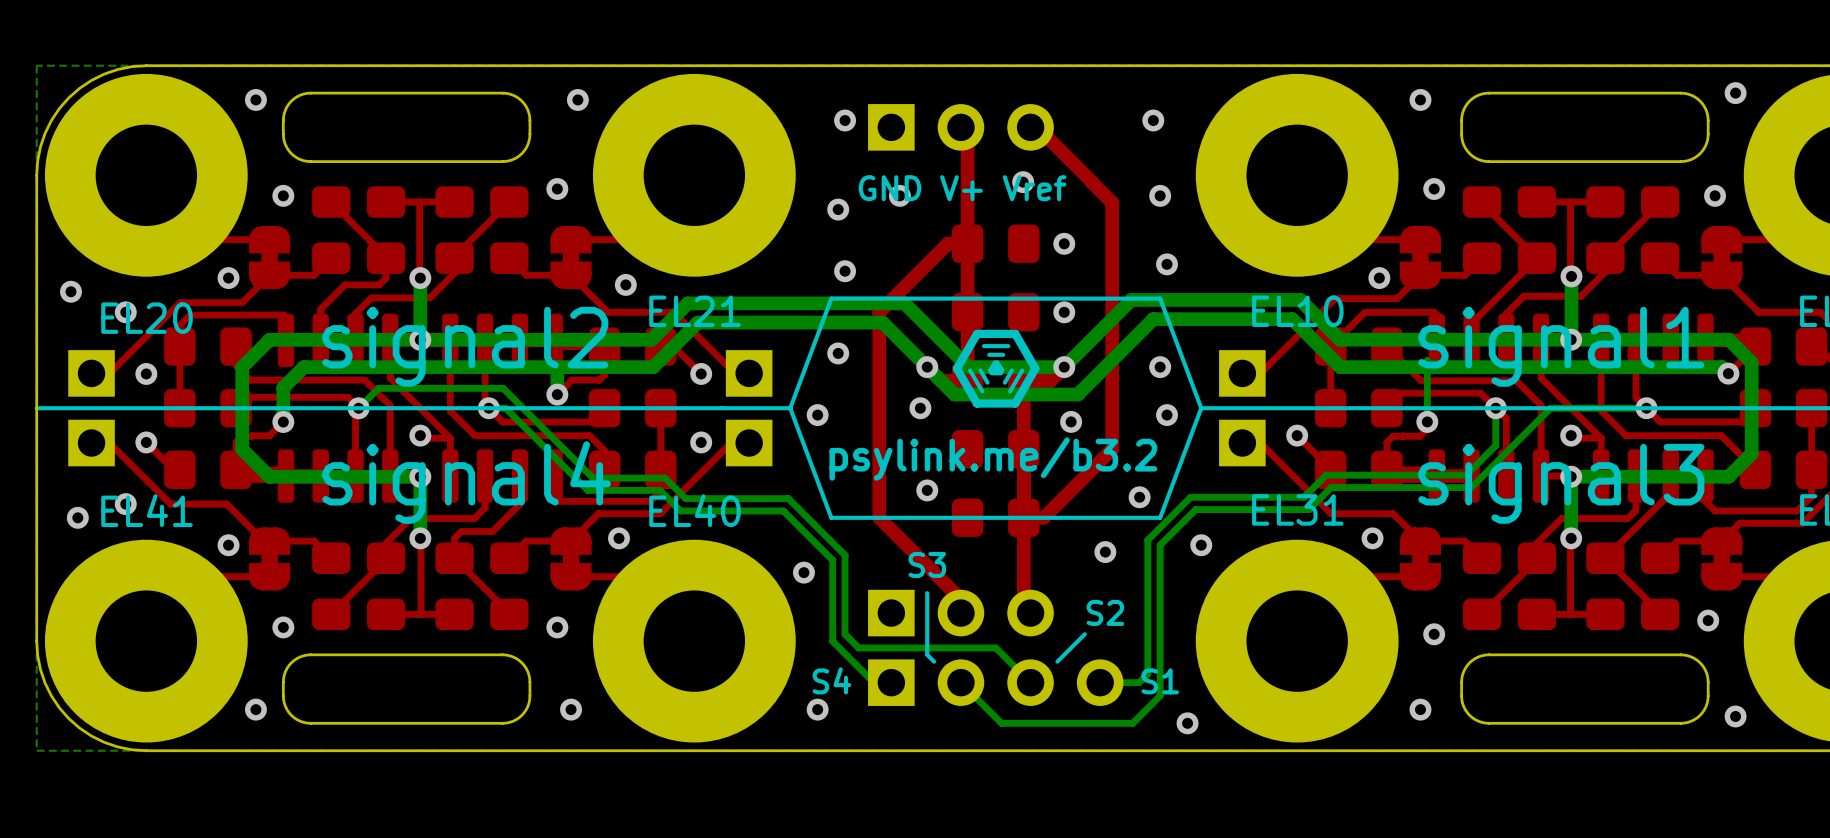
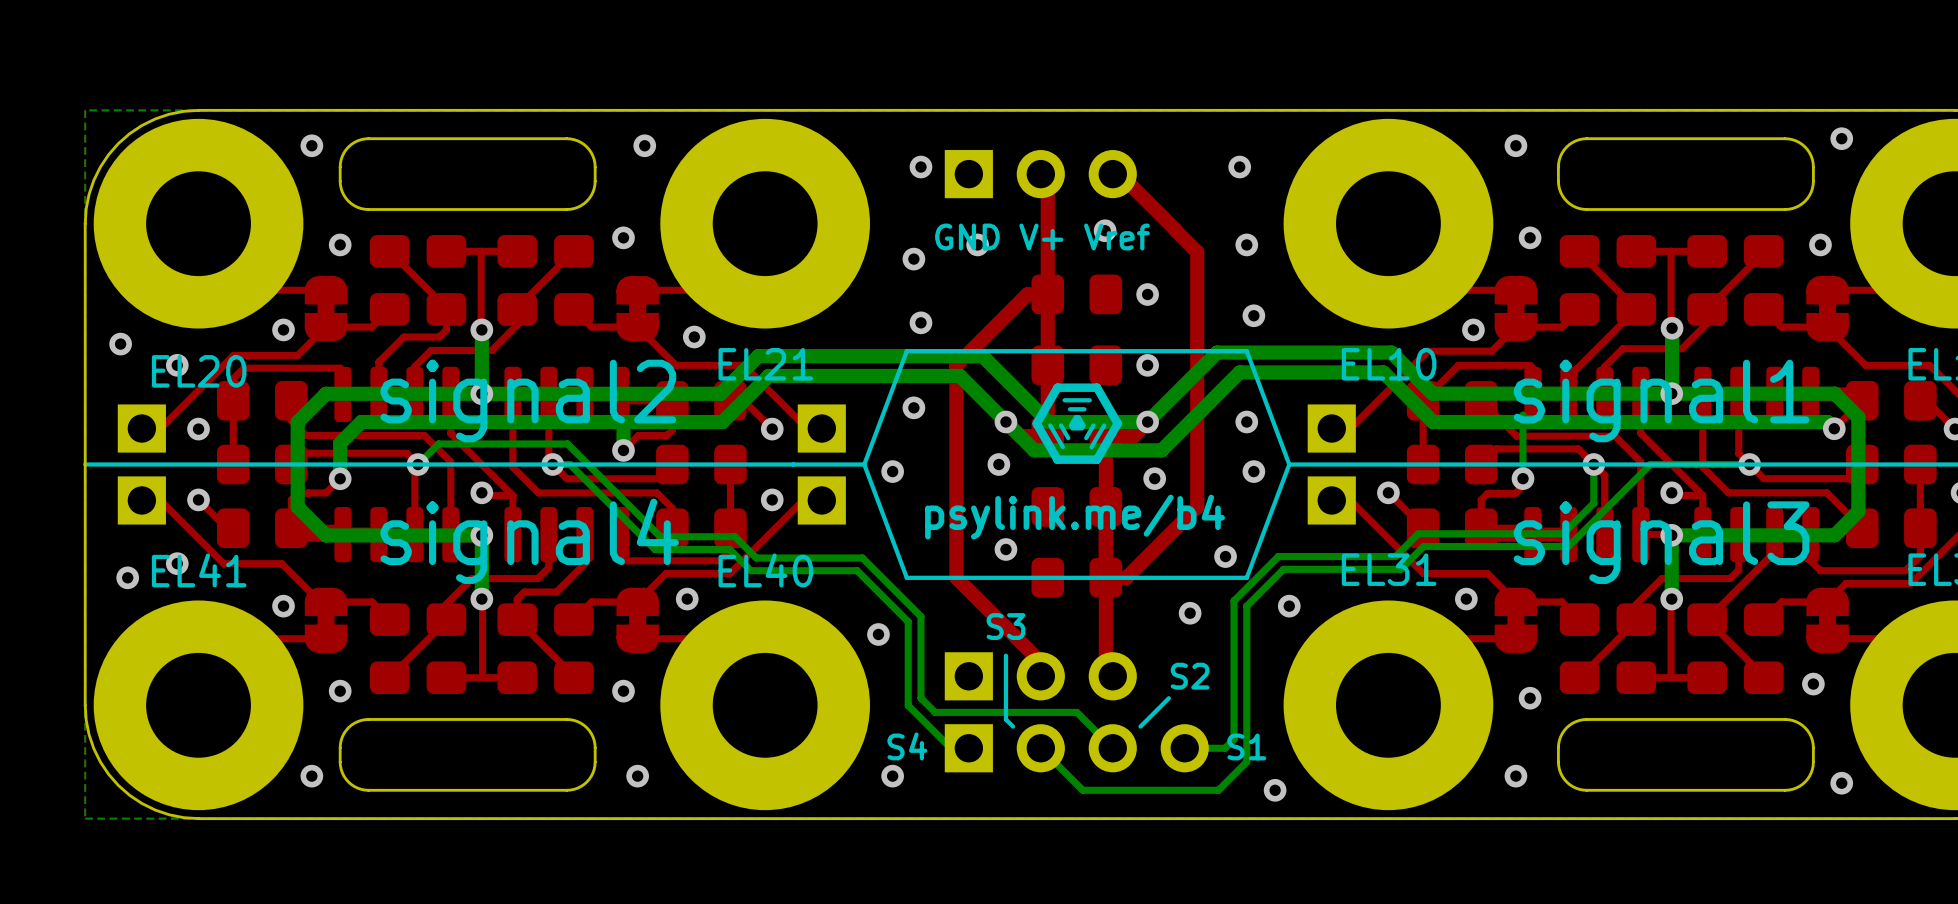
text: psylink.me/b3.2 (993, 459) -> psylink.me/b4 (1074, 517)

